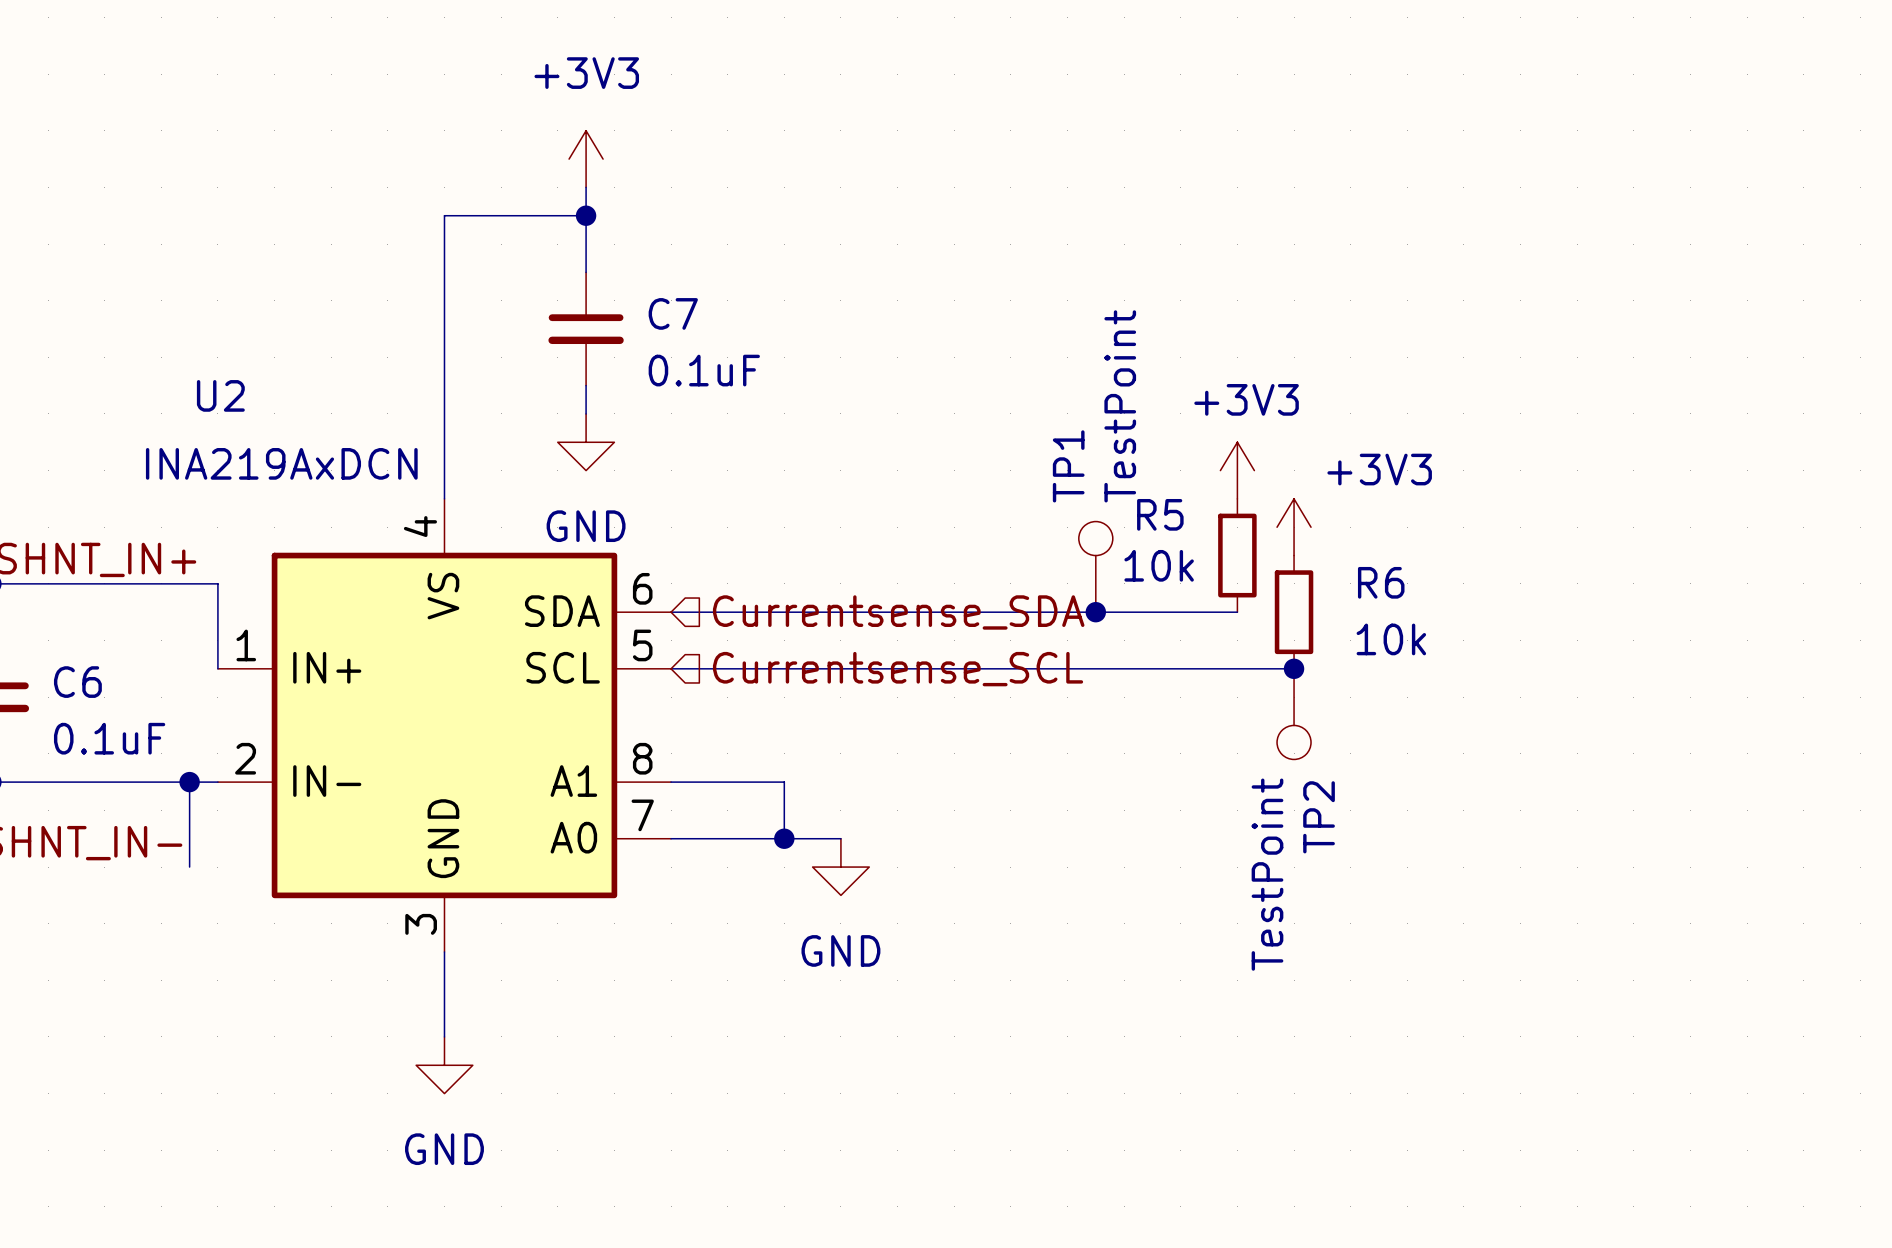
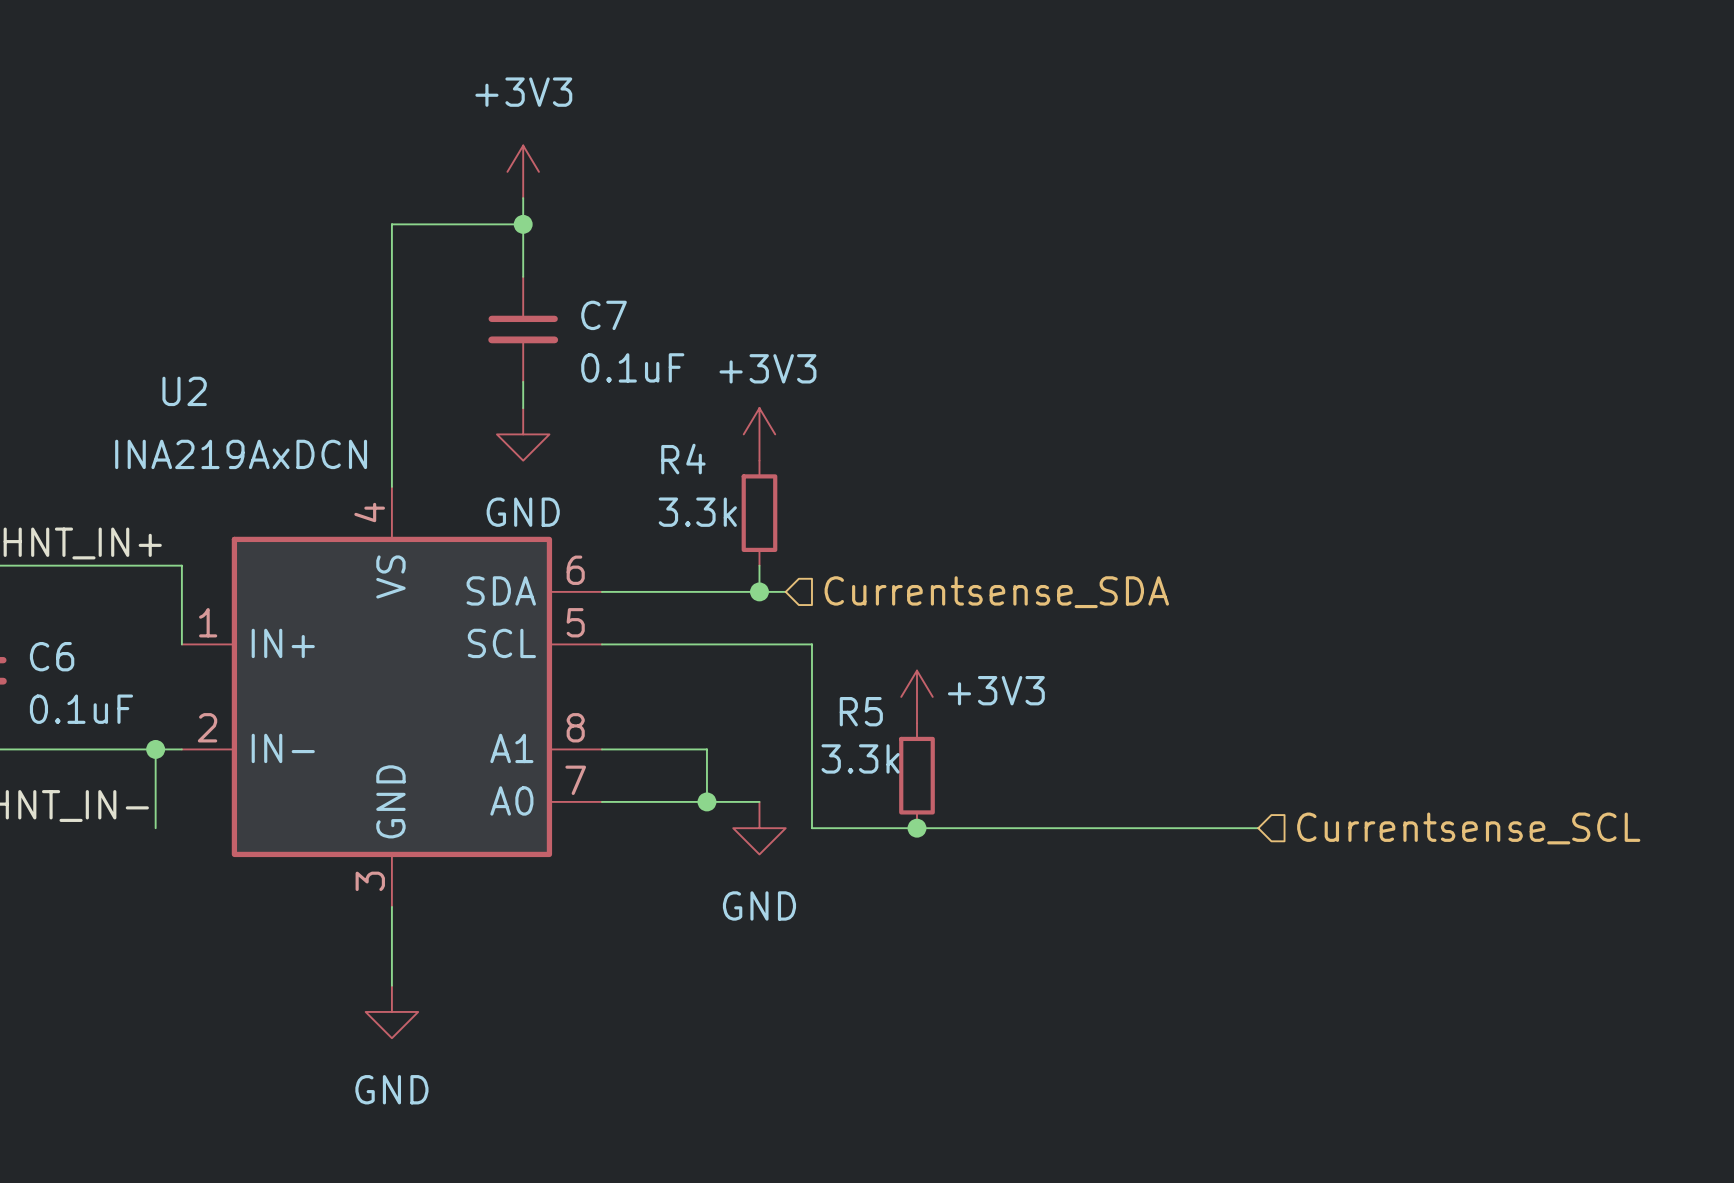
power symbol: none -> +3V3 (759, 434)
power symbol: +3V3 (1237, 470) -> none
R5 name position: R5 (1160, 514) -> R5 (861, 711)
R4: none -> 3.3k (759, 513)
power symbol: +3V3 (1294, 527) -> none
R5 position: (1237, 555) -> (917, 775)
R5 value: 10k (1159, 565) -> 3.3k (860, 758)
TP1: TestPoint (1095, 566) -> none
wire: none -> (759, 565) (759, 591)
junction: none -> (759, 591)
wire: (869, 612) (1237, 612) -> none
hierarchical label position: Currentsense_SDA (898, 612) -> Currentsense_SDA (996, 592)
junction: (1095, 612) -> none
R6: 10k (1294, 612) -> none
wire: (897, 668) (1294, 668) -> (811, 644) (811, 828) (1258, 828)
junction: (1294, 668) -> none
hierarchical label: Currentsense_SCL (898, 669) -> none
TP2: TestPoint (1294, 714) -> none
power symbol: none -> +3V3 (917, 696)
junction: none -> (917, 828)
hierarchical label: none -> Currentsense_SCL (1468, 828)

